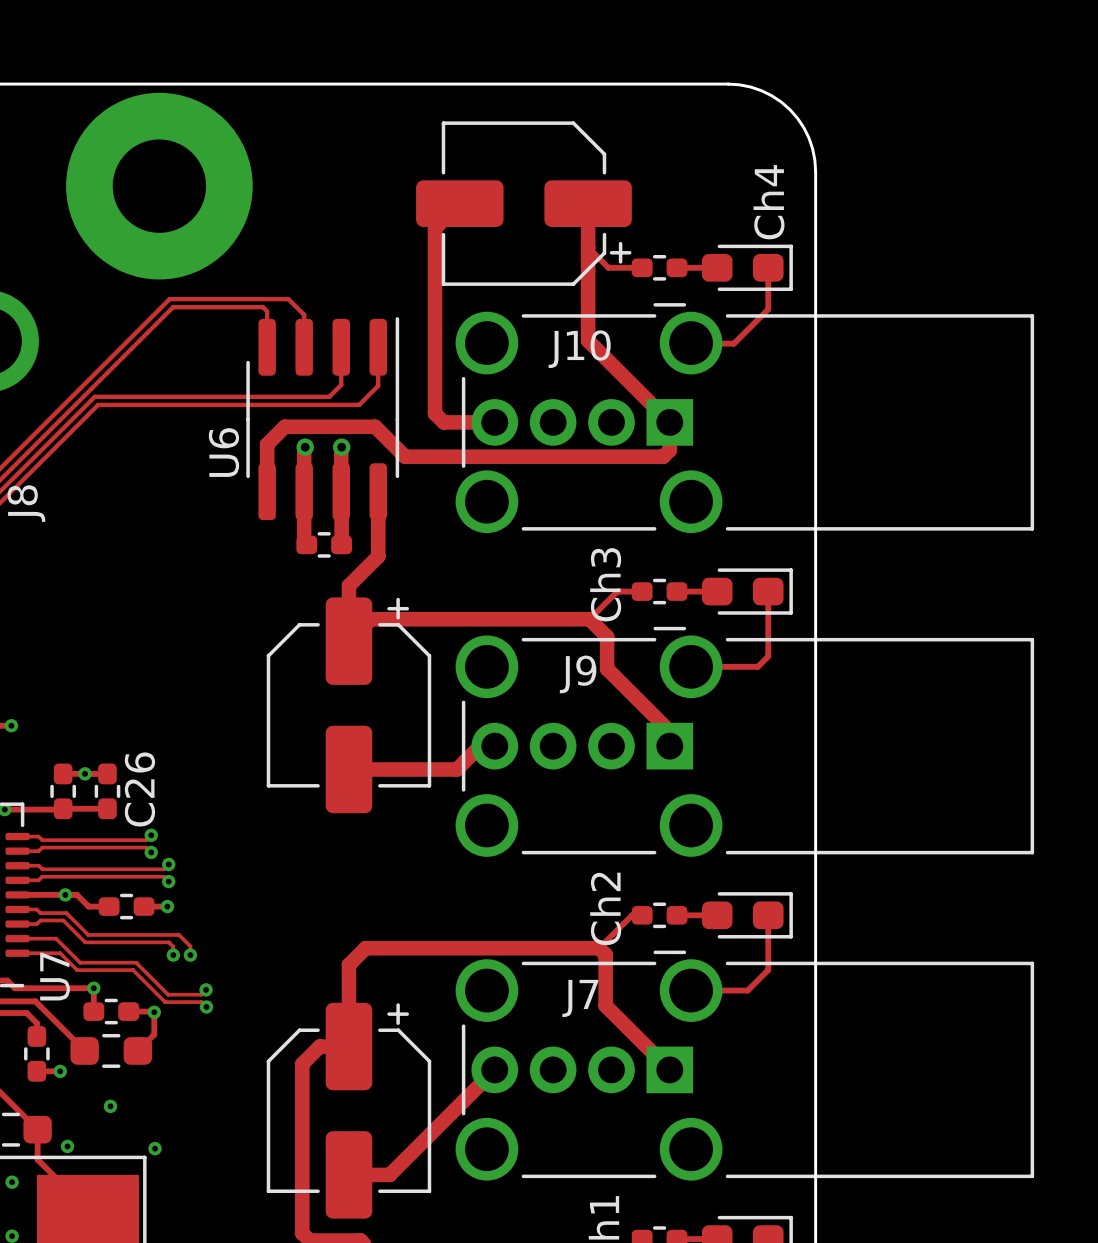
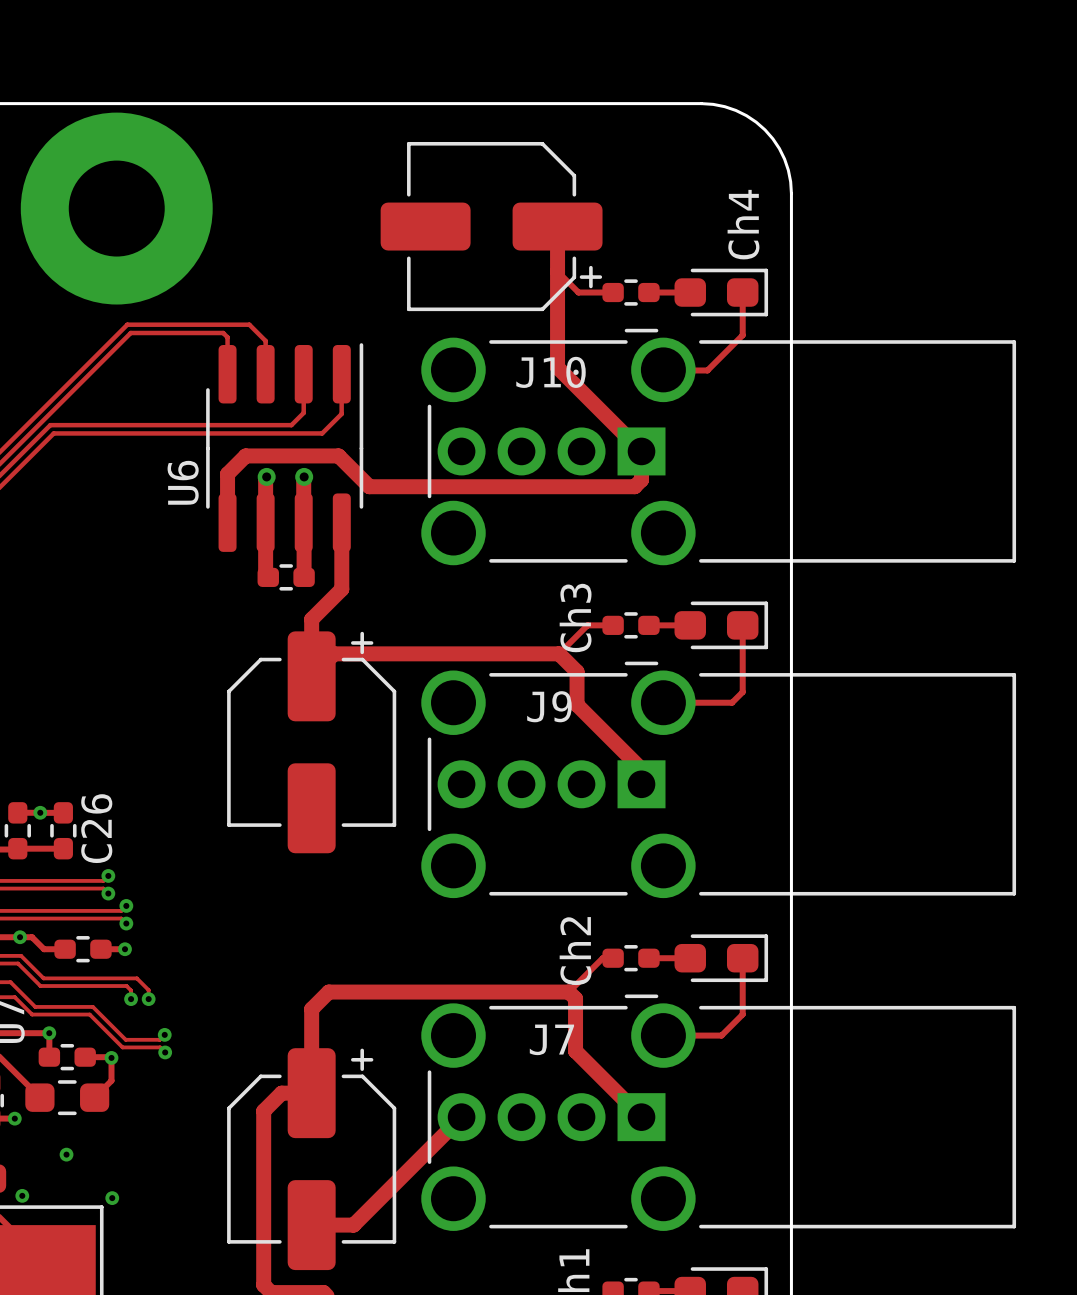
track: (459, 203) (435, 228) (435, 413) (443, 422) (494, 422) -> none
track: (494, 746) (480, 746) (456, 769) (348, 769) -> none

